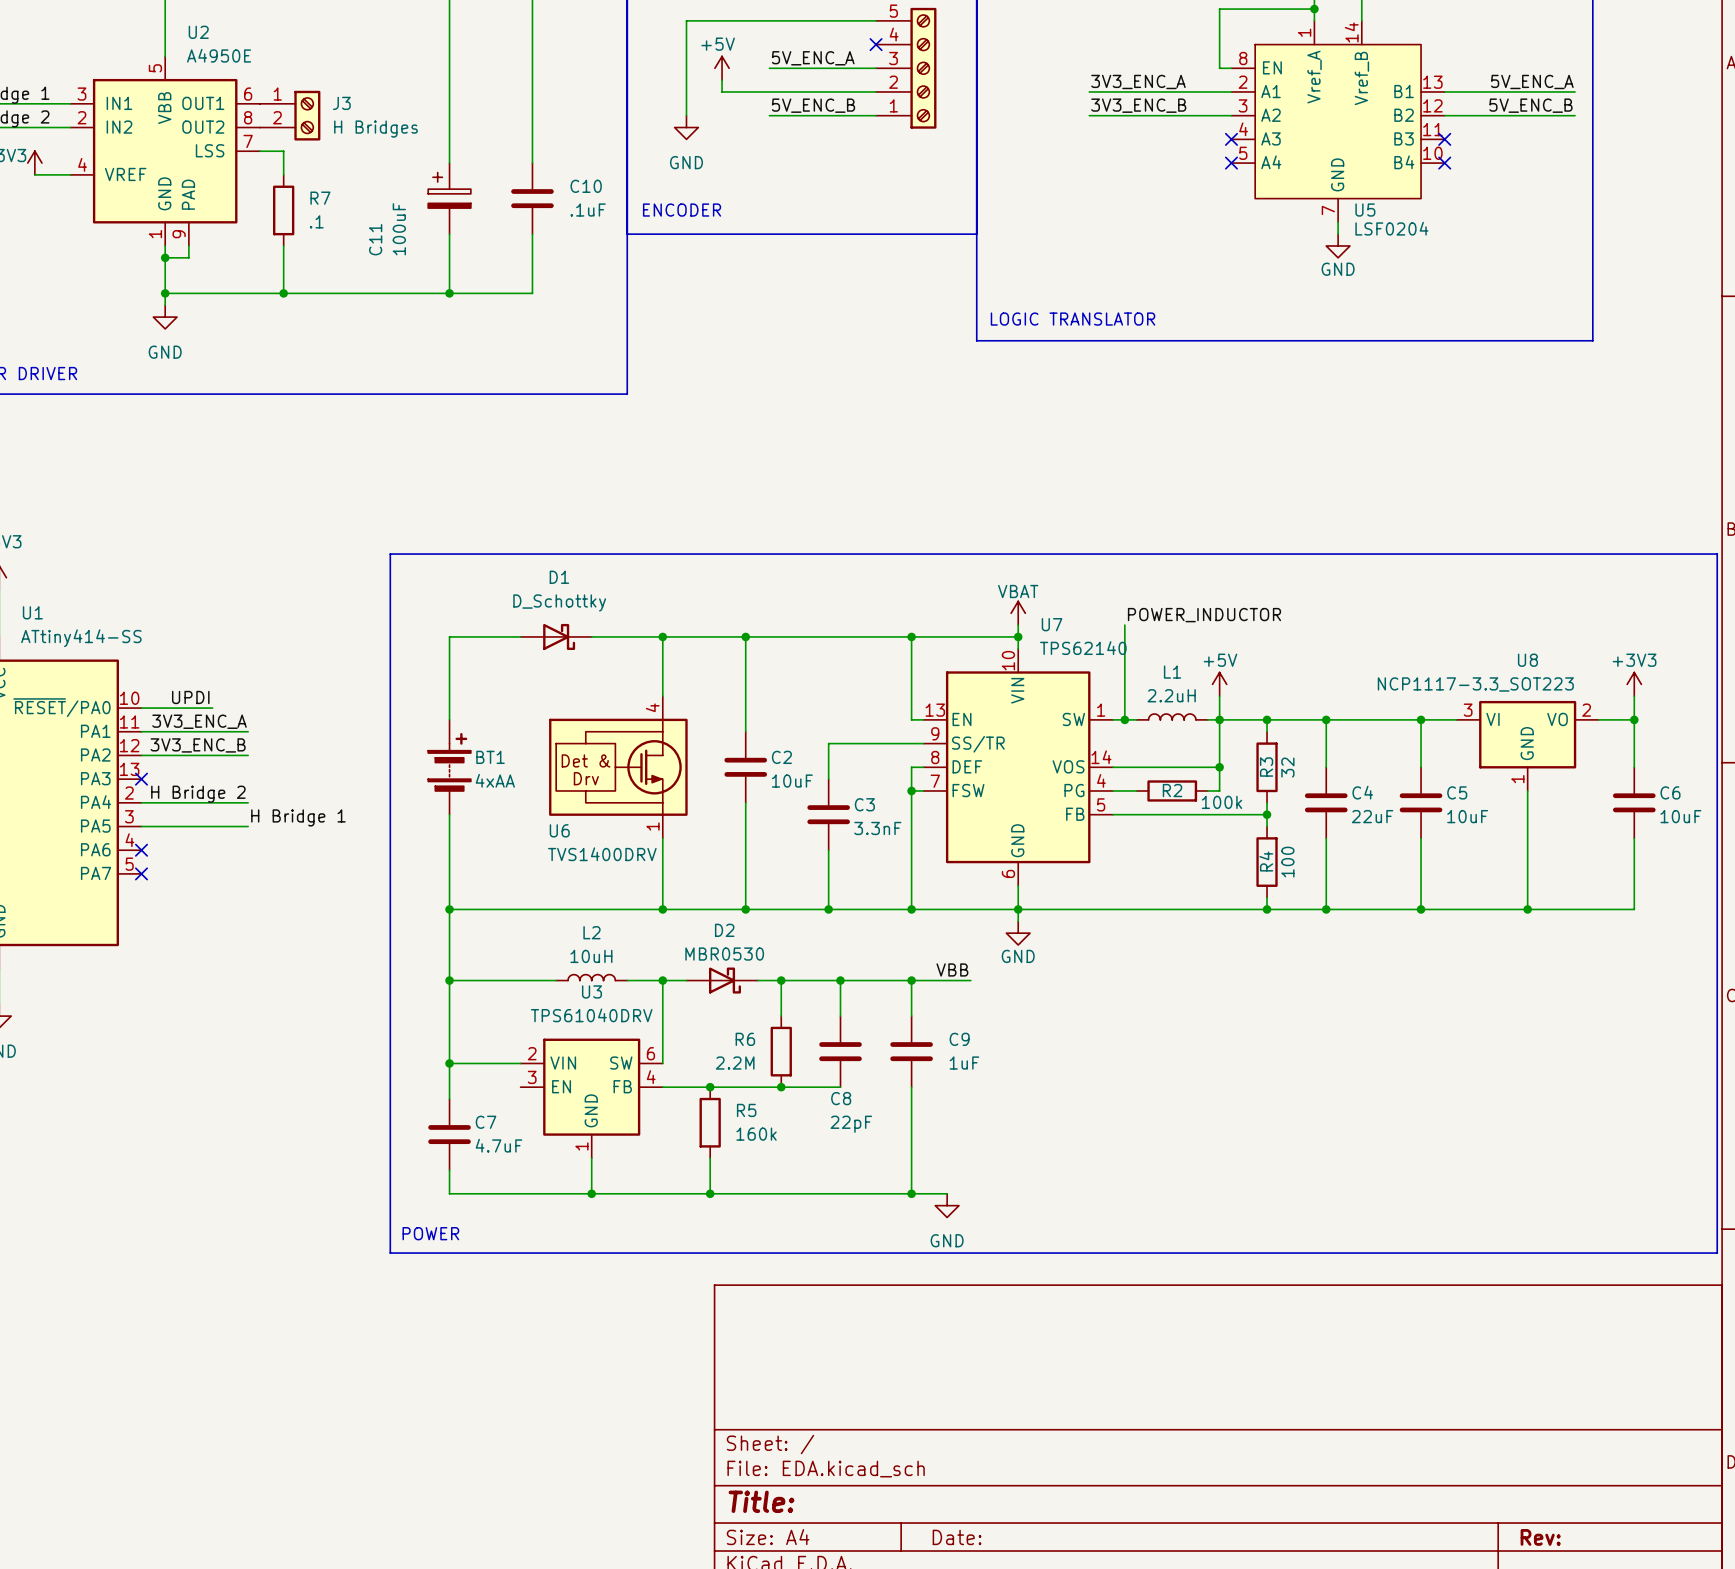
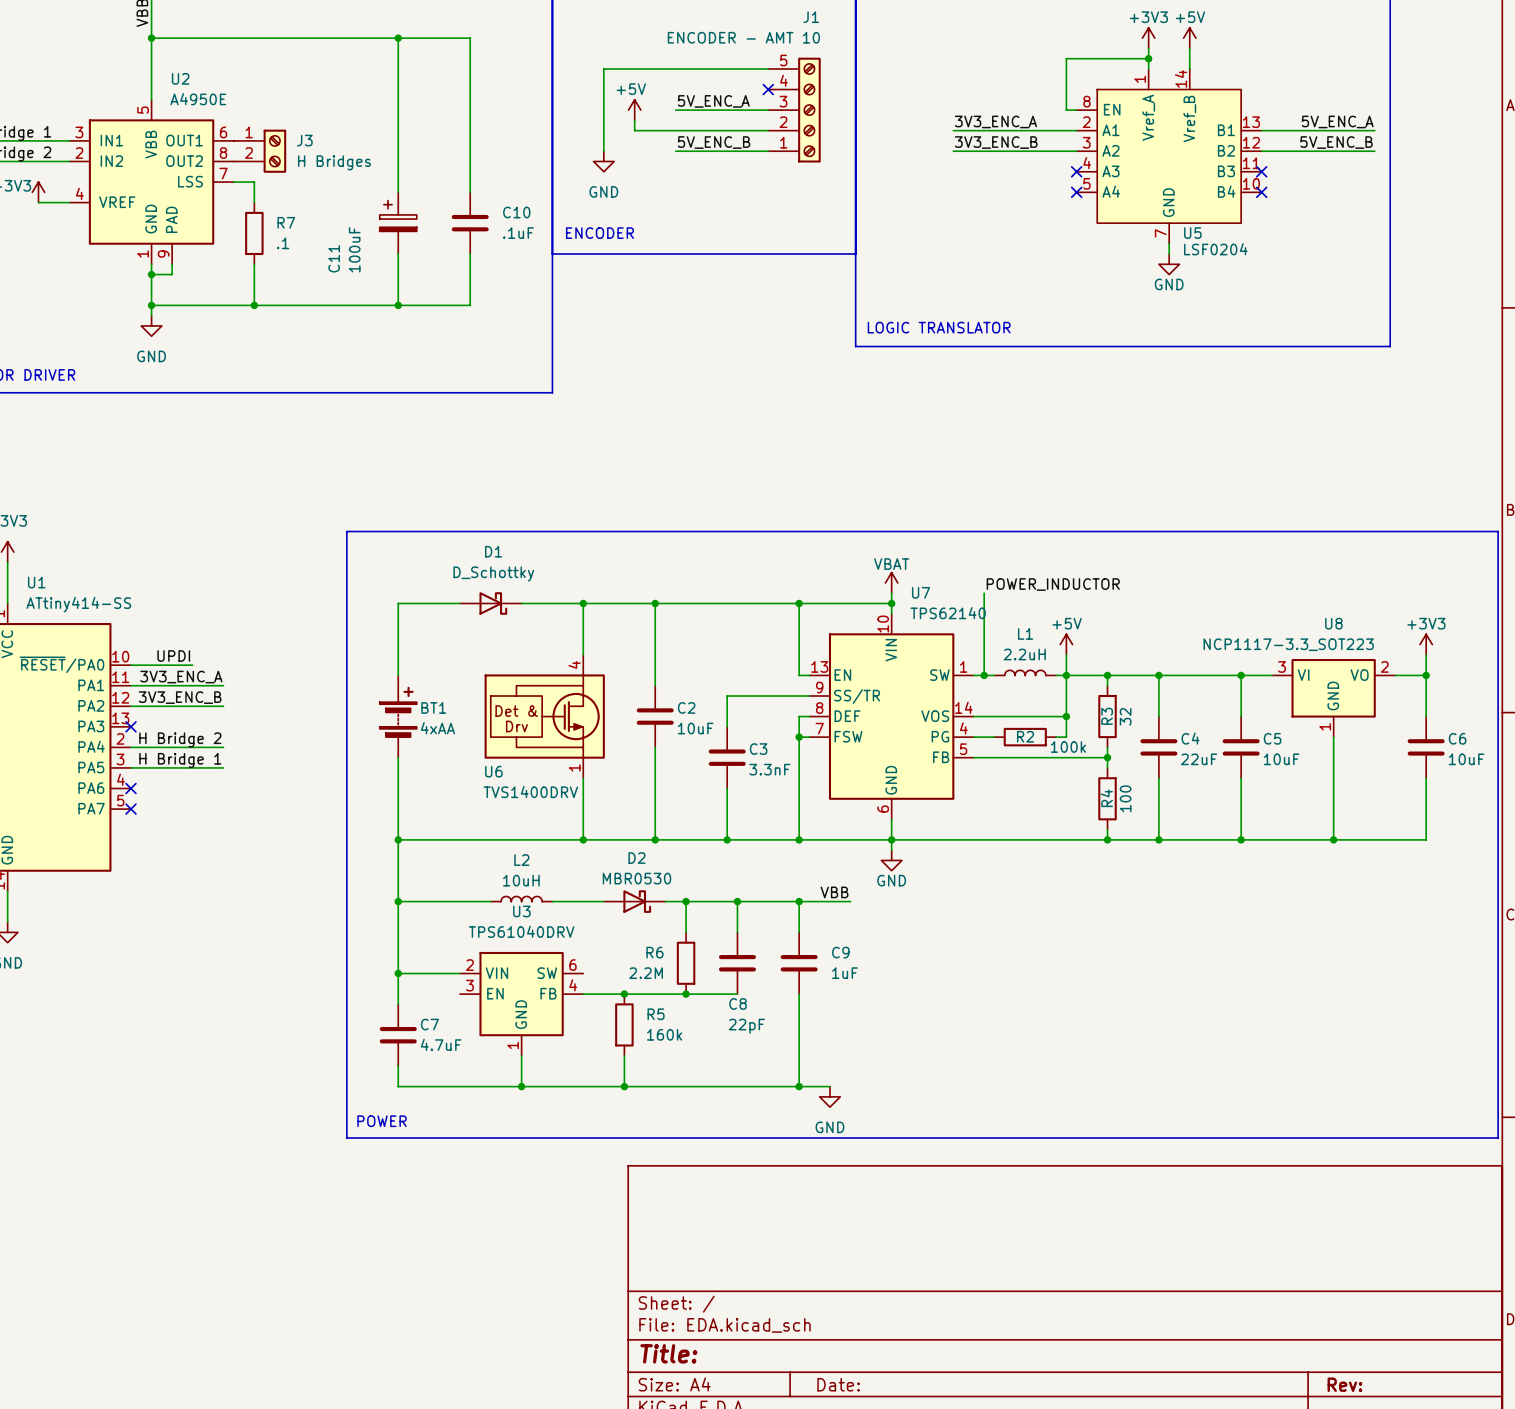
label position: H Bridge 1 (298, 817) -> H Bridge 1 (180, 760)
wire: (662, 980) (662, 1063) -> none
junction: (662, 980) -> none

